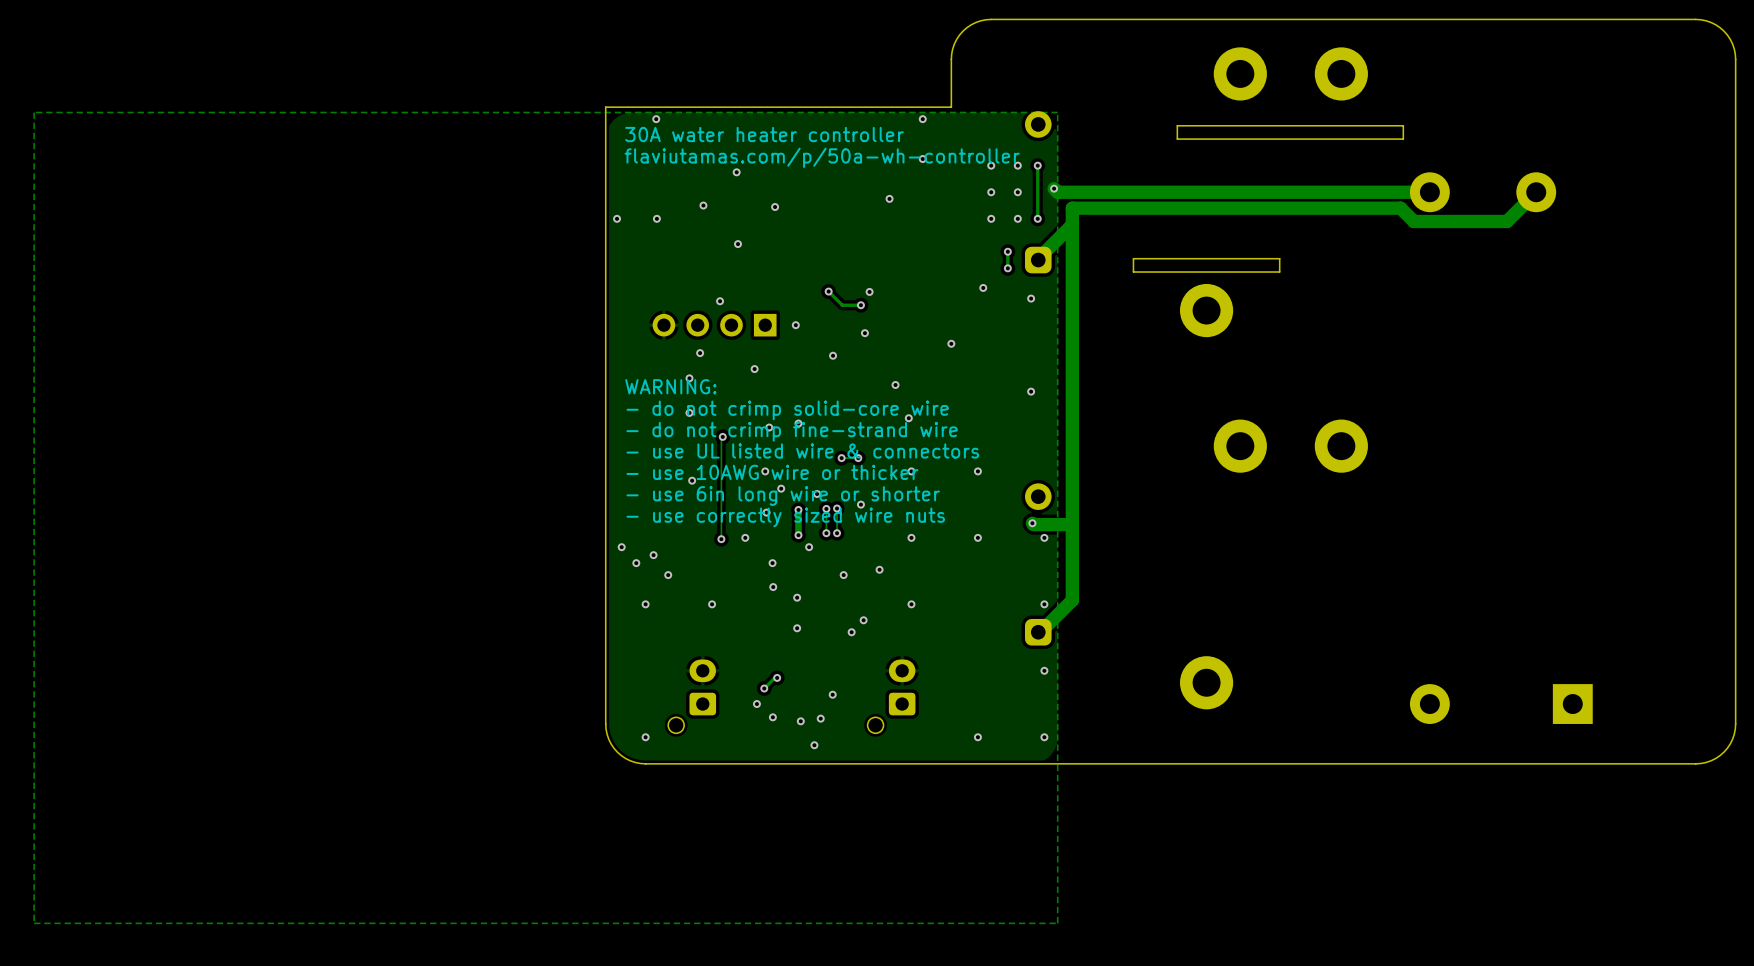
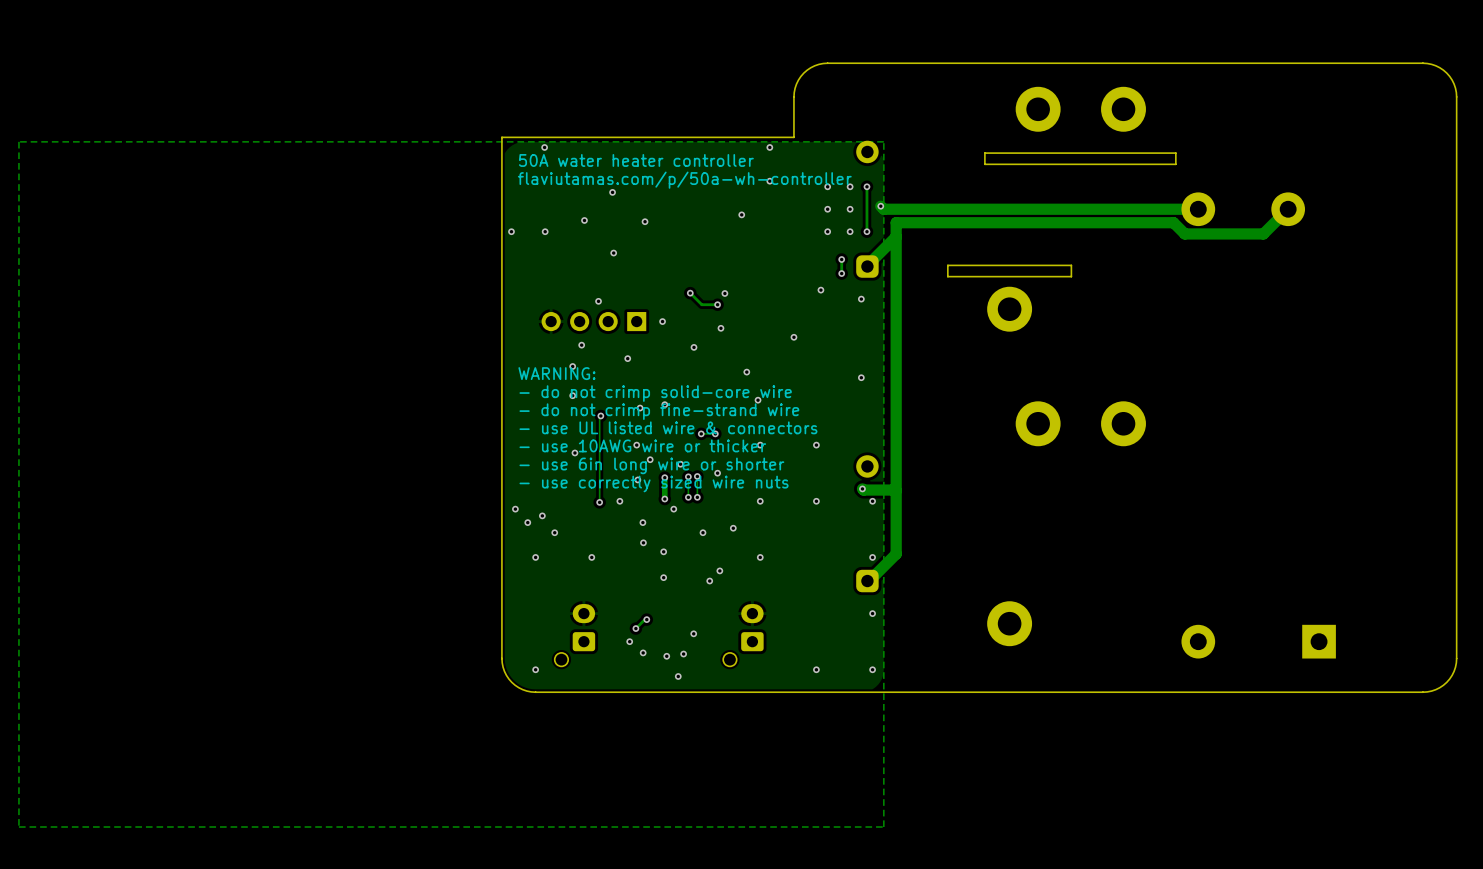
text: 30A water heater controller (764, 134) -> 50A water heater controller (636, 160)

